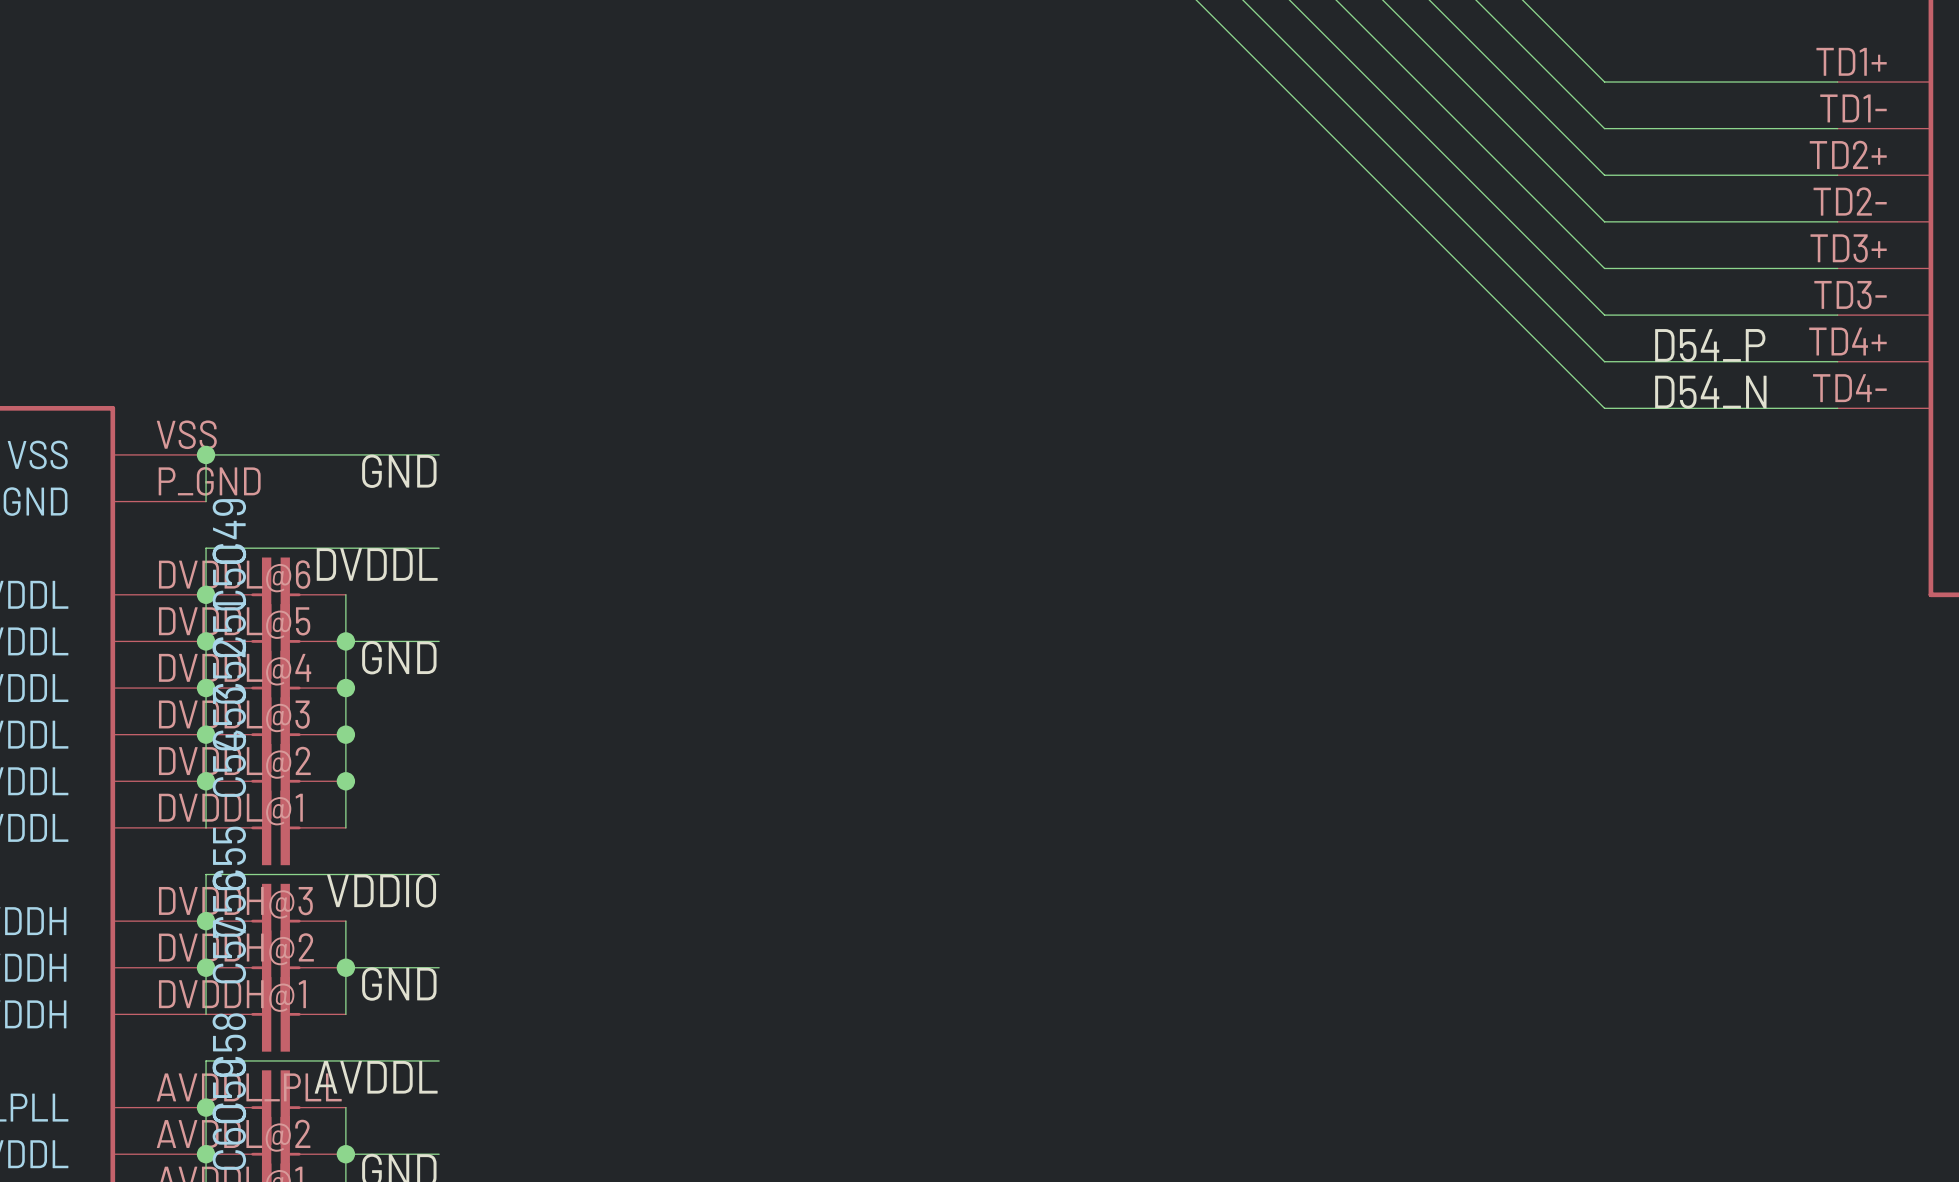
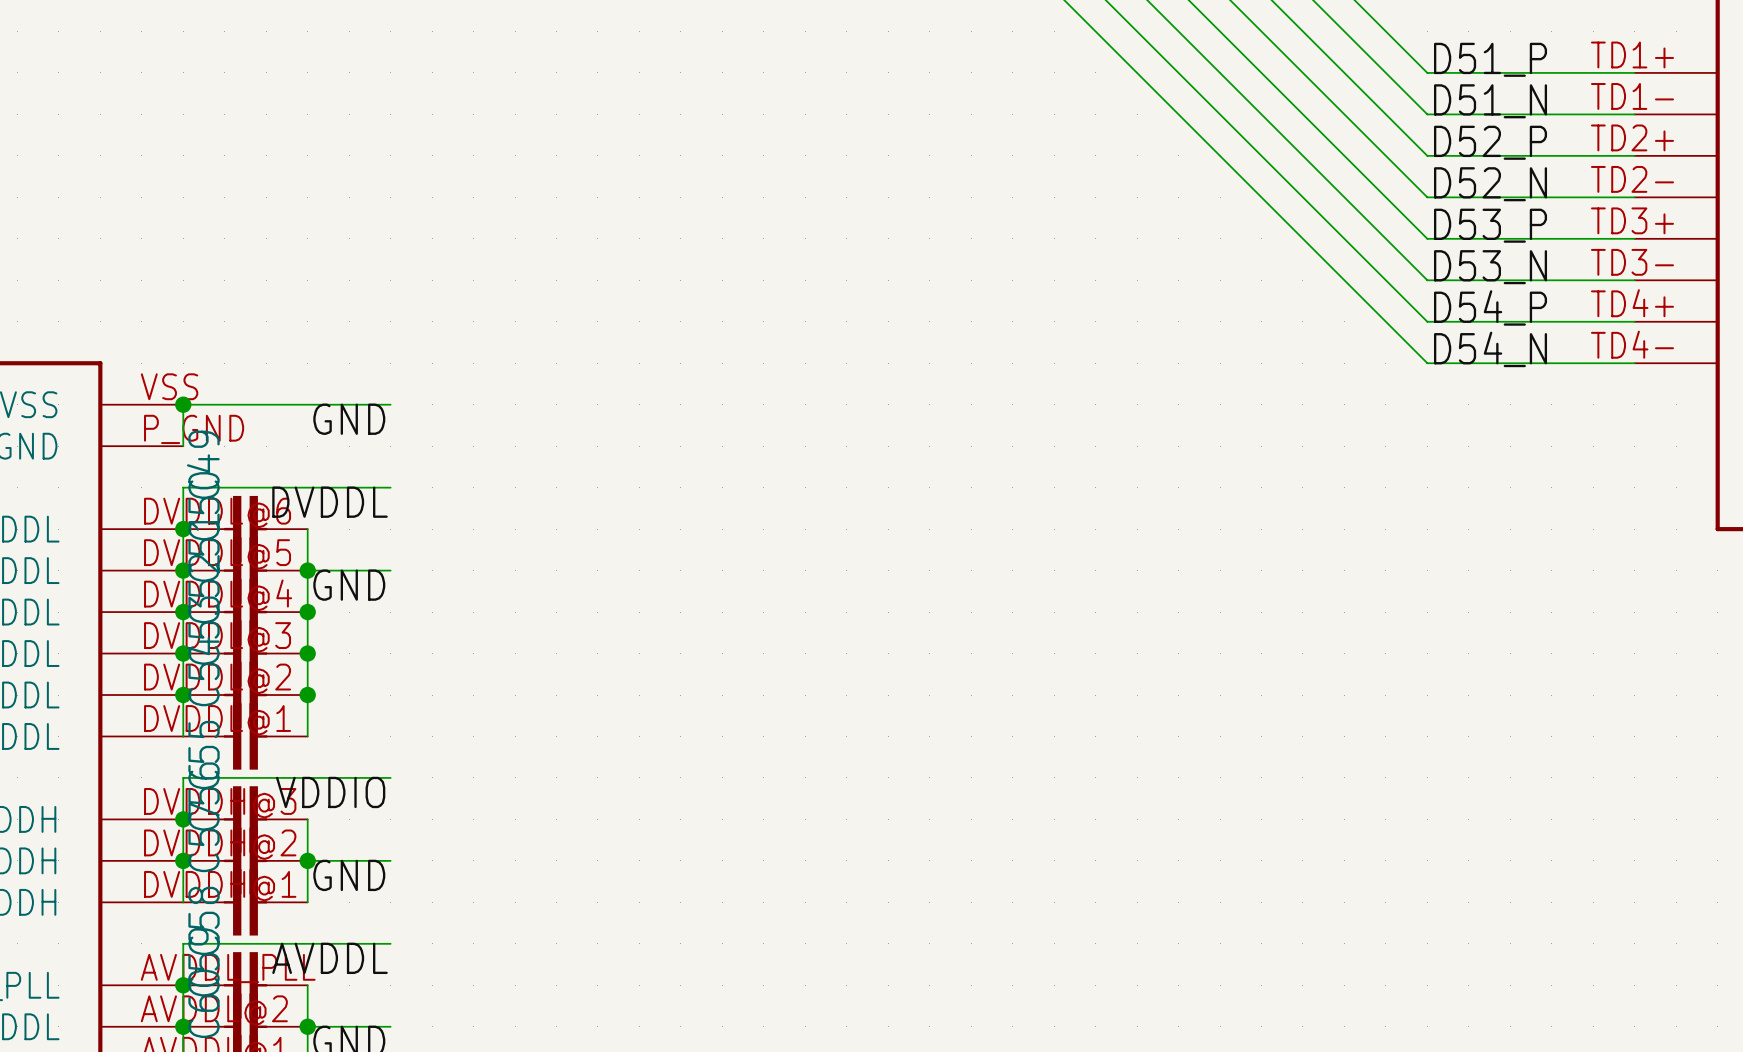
label: none -> D51_P (1490, 59)
label: none -> D51_N (1490, 101)
label: none -> D52_P (1490, 142)
label: none -> D52_N (1490, 184)
label: none -> D53_P (1490, 225)
label: none -> D53_N (1490, 267)
label position: D54_P (1710, 345) -> D54_P (1490, 307)
label position: D54_N (1710, 392) -> D54_N (1490, 349)

